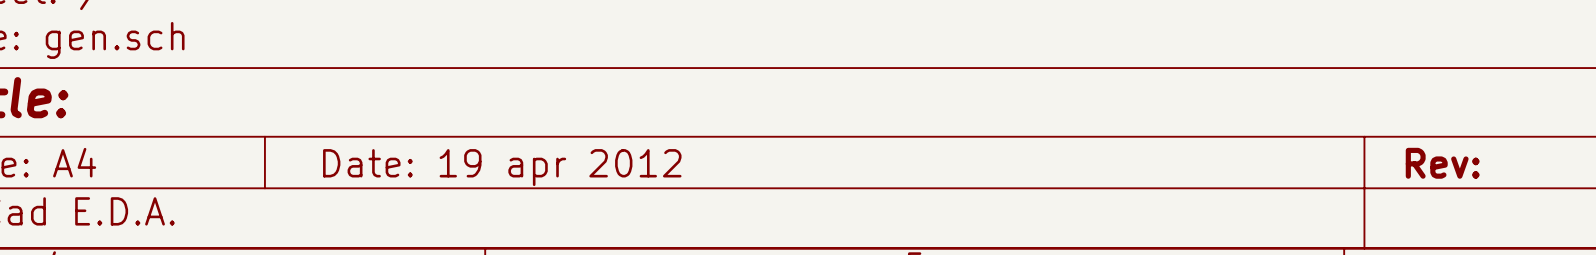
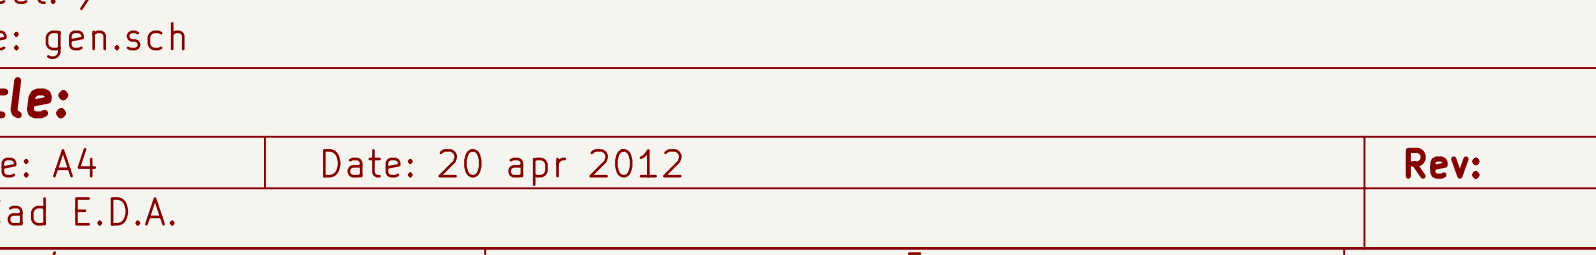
title block: Date: 19 apr 2012 (502, 167) -> Date: 20 apr 2012 (502, 167)

